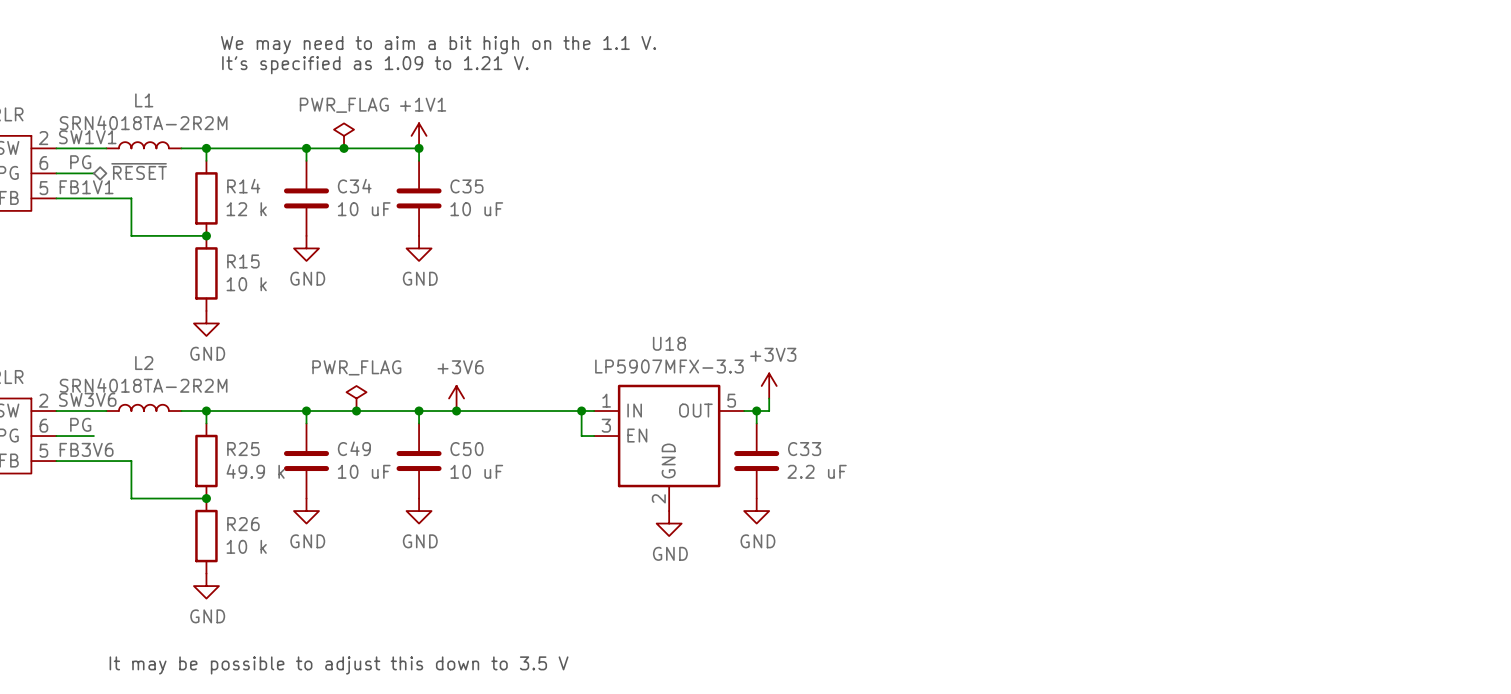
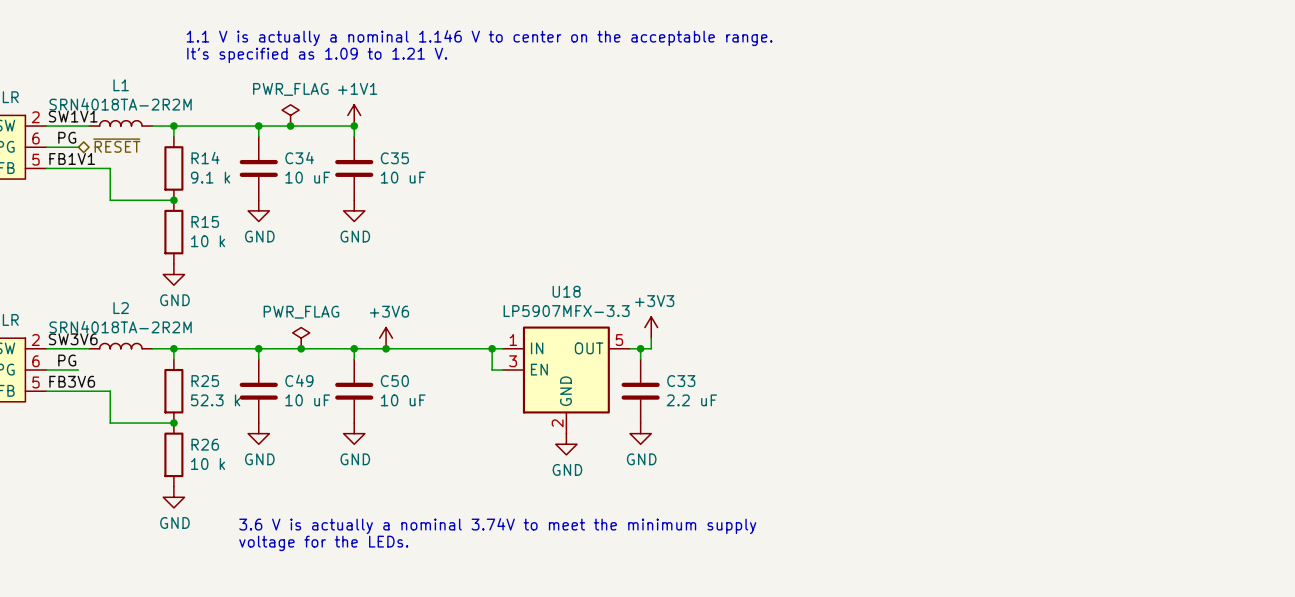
text: We may need to aim a bit high on the 1.1 V. (438, 45) -> 1.1 V is actually a nominal 1.146 V to center on the acceptable range. (479, 38)
R14 value: 12 k (246, 209) -> 9.1 k (210, 177)
R25 value: 49.9 k (255, 471) -> 52.3 k (215, 400)
text: none -> 3.6 V is actually a nominal 3.74V to meet the minimum supply (497, 526)
text: none -> voltage for the LEDs. (323, 543)
text: It may be possible to adjust this down to 3.5 V (339, 665) -> none

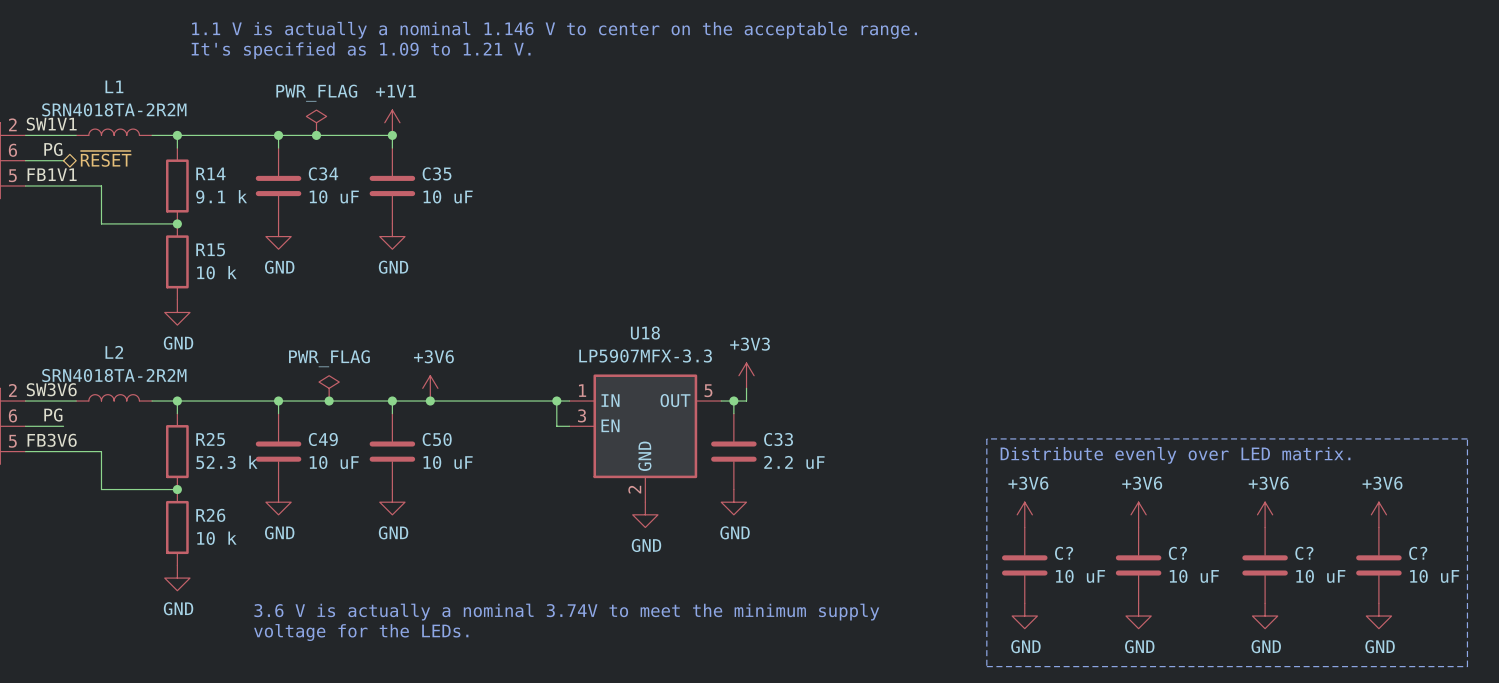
line: none -> (986, 438) (986, 666) (1467, 666) (1467, 438) (986, 438)
text: none -> Distribute evenly over LED matrix. (1175, 455)
power symbol: none -> +3V6 (1024, 514)
power symbol: none -> +3V6 (1138, 514)
power symbol: none -> +3V6 (1265, 514)
power symbol: none -> +3V6 (1378, 514)
C?: none -> 10 uF (1024, 565)
C?: none -> 10 uF (1138, 565)
C?: none -> 10 uF (1265, 565)
C?: none -> 10 uF (1378, 565)
power symbol: none -> GND (1024, 616)
power symbol: none -> GND (1138, 616)
power symbol: none -> GND (1265, 616)
power symbol: none -> GND (1378, 616)

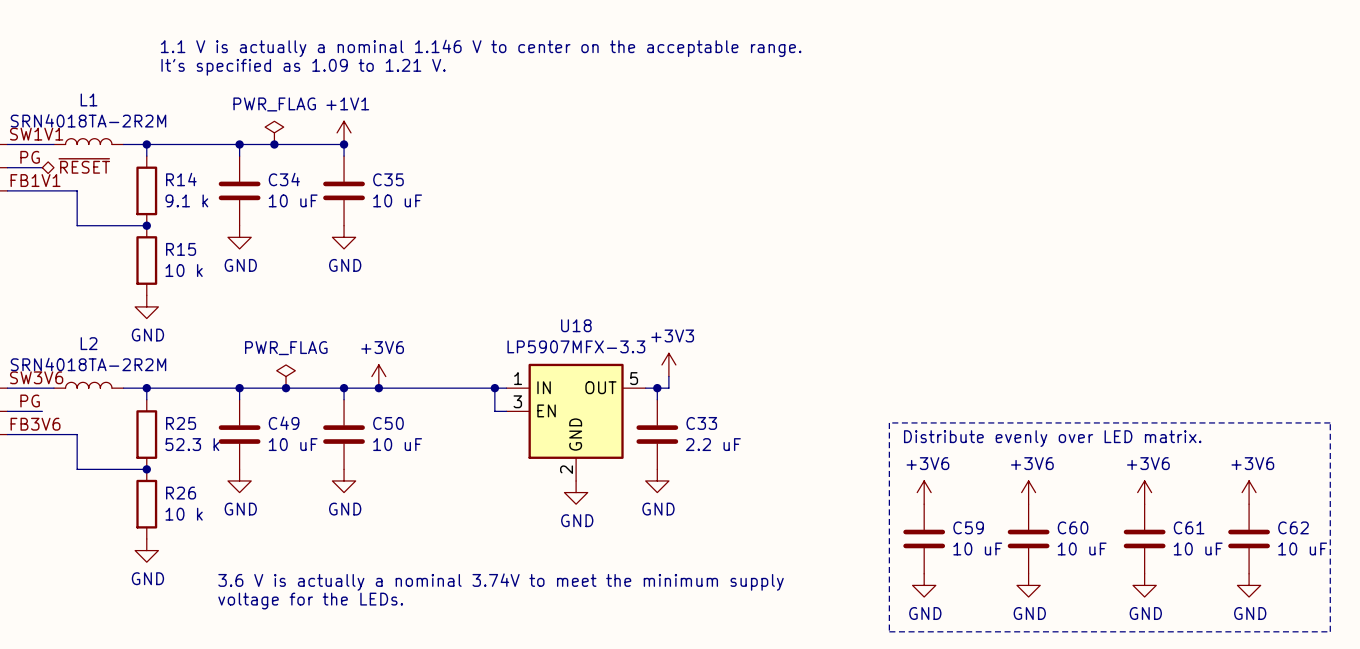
C? name: C? (1064, 553) -> C59 (968, 527)
C? name: C? (1177, 553) -> C60 (1073, 527)
C? name: C? (1304, 553) -> C61 (1189, 527)
C? name: C? (1418, 553) -> C62 (1293, 527)

